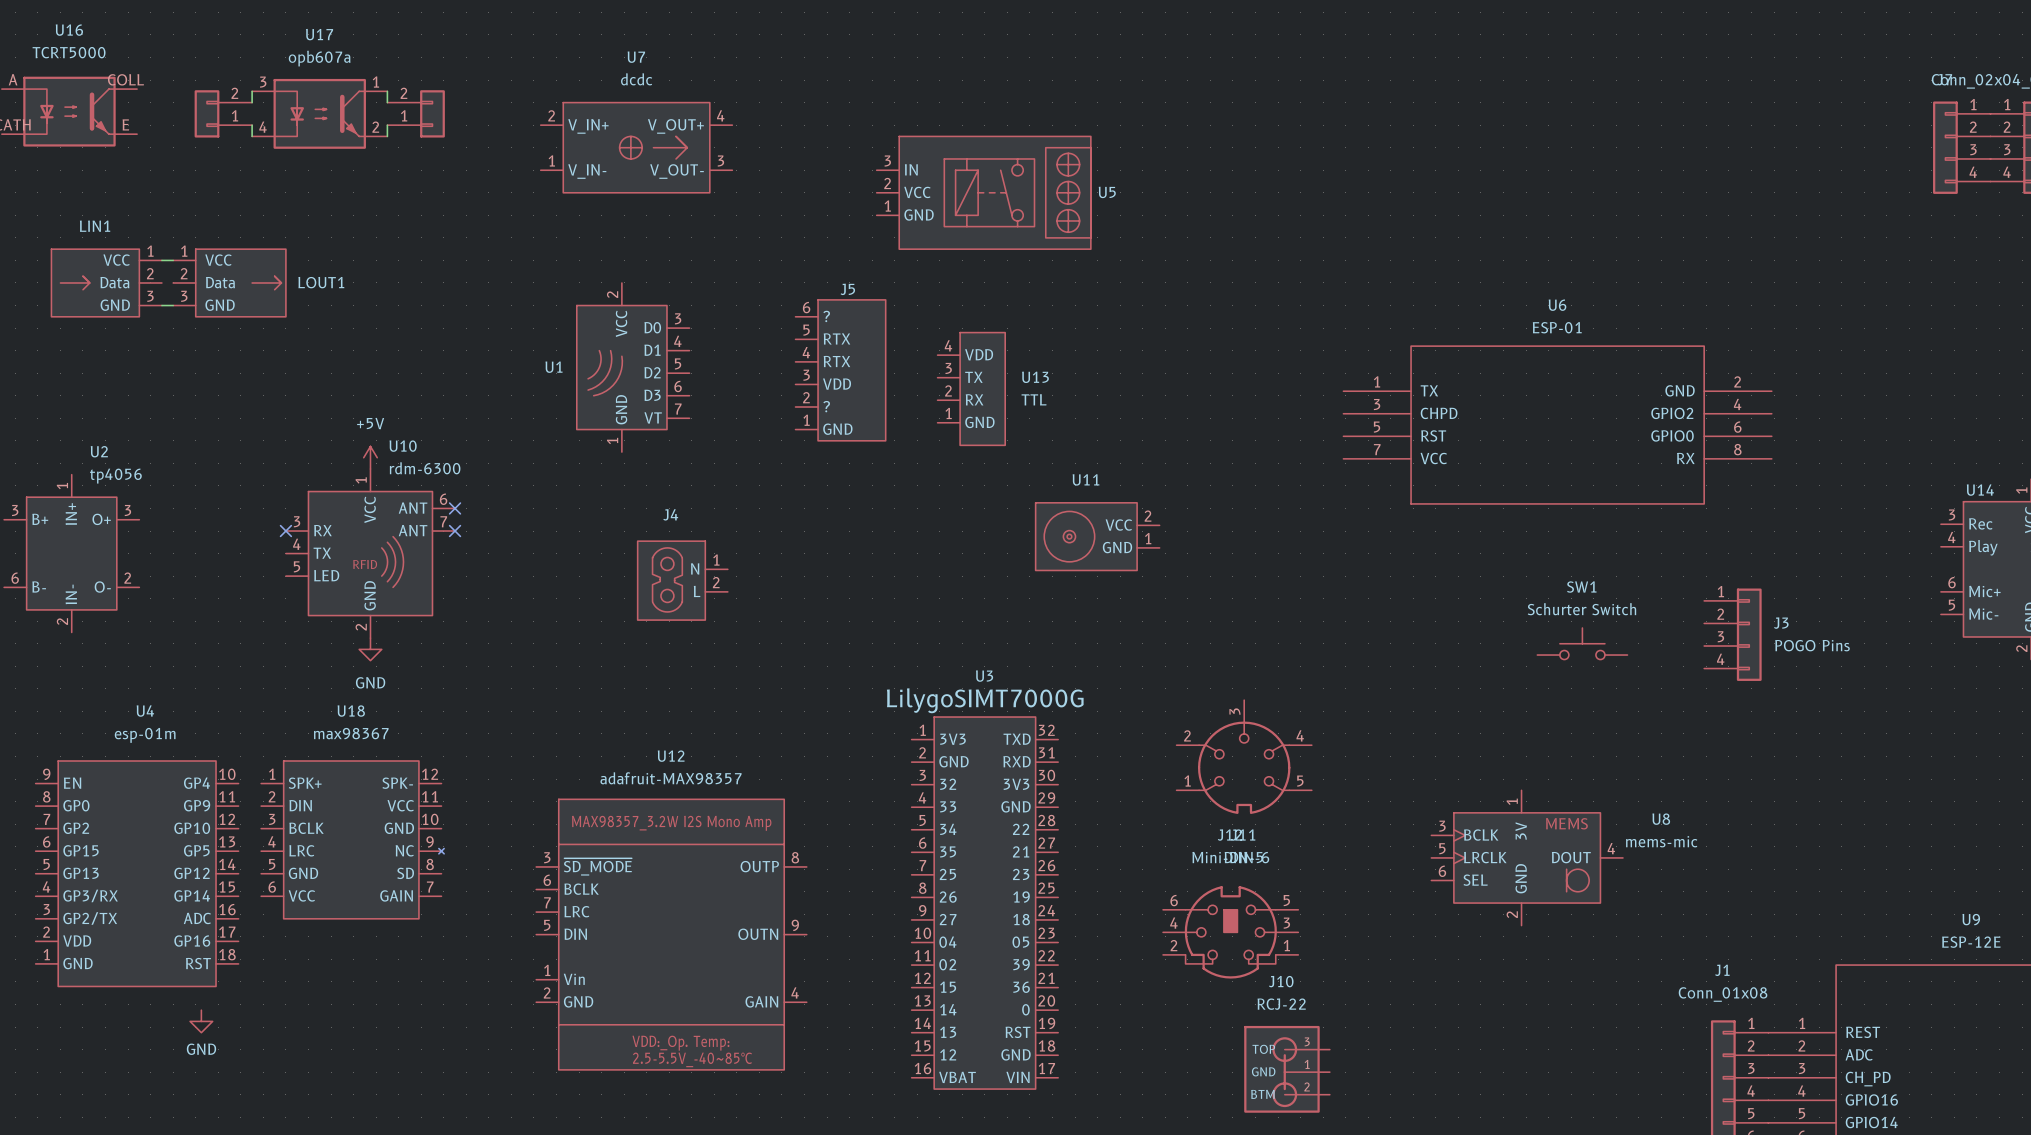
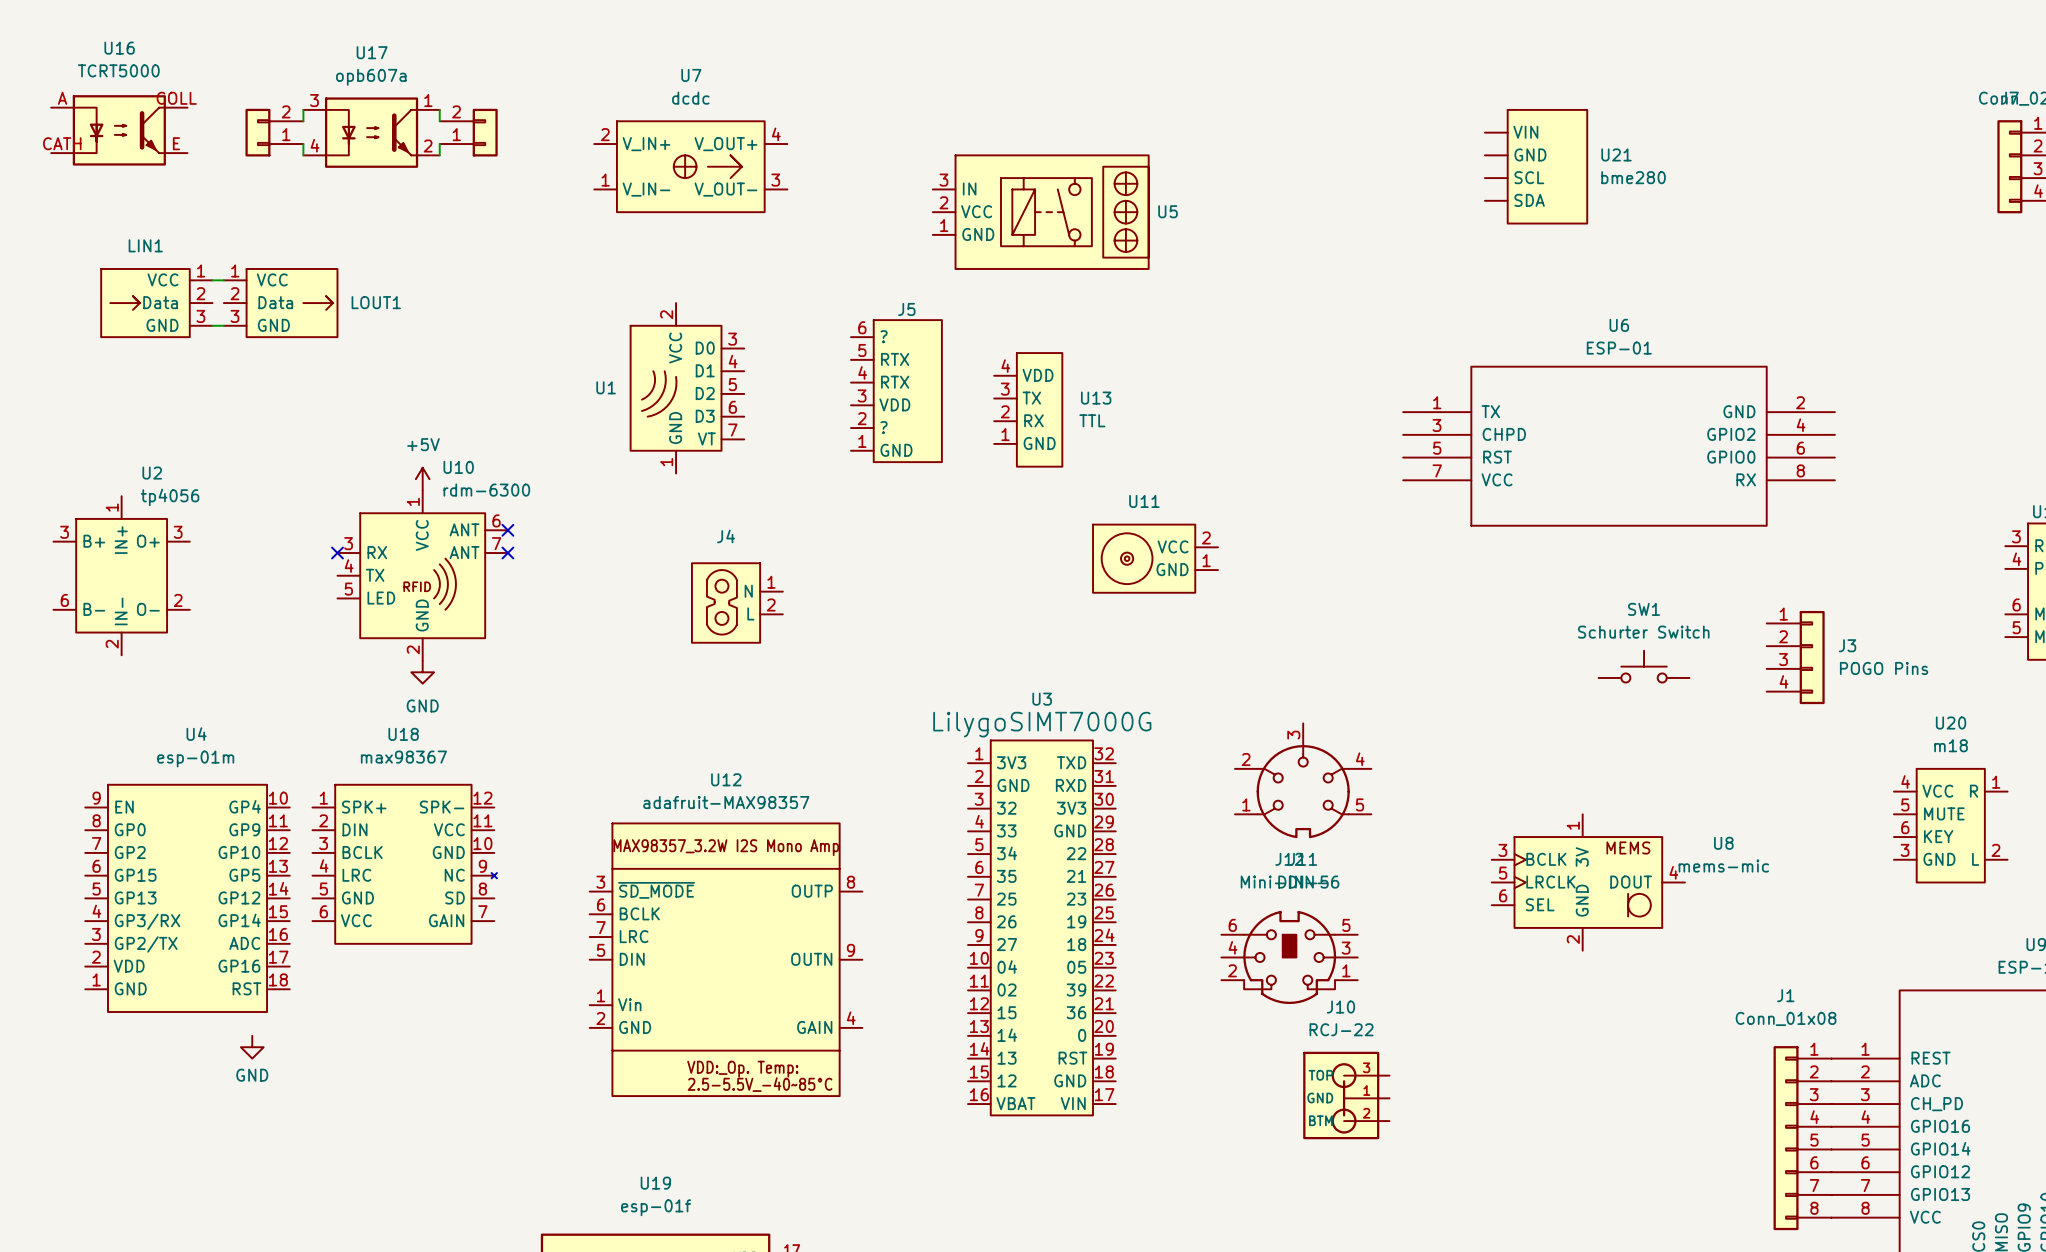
U21: none -> bme280 (1536, 166)
U20: none -> m18 (1950, 825)

